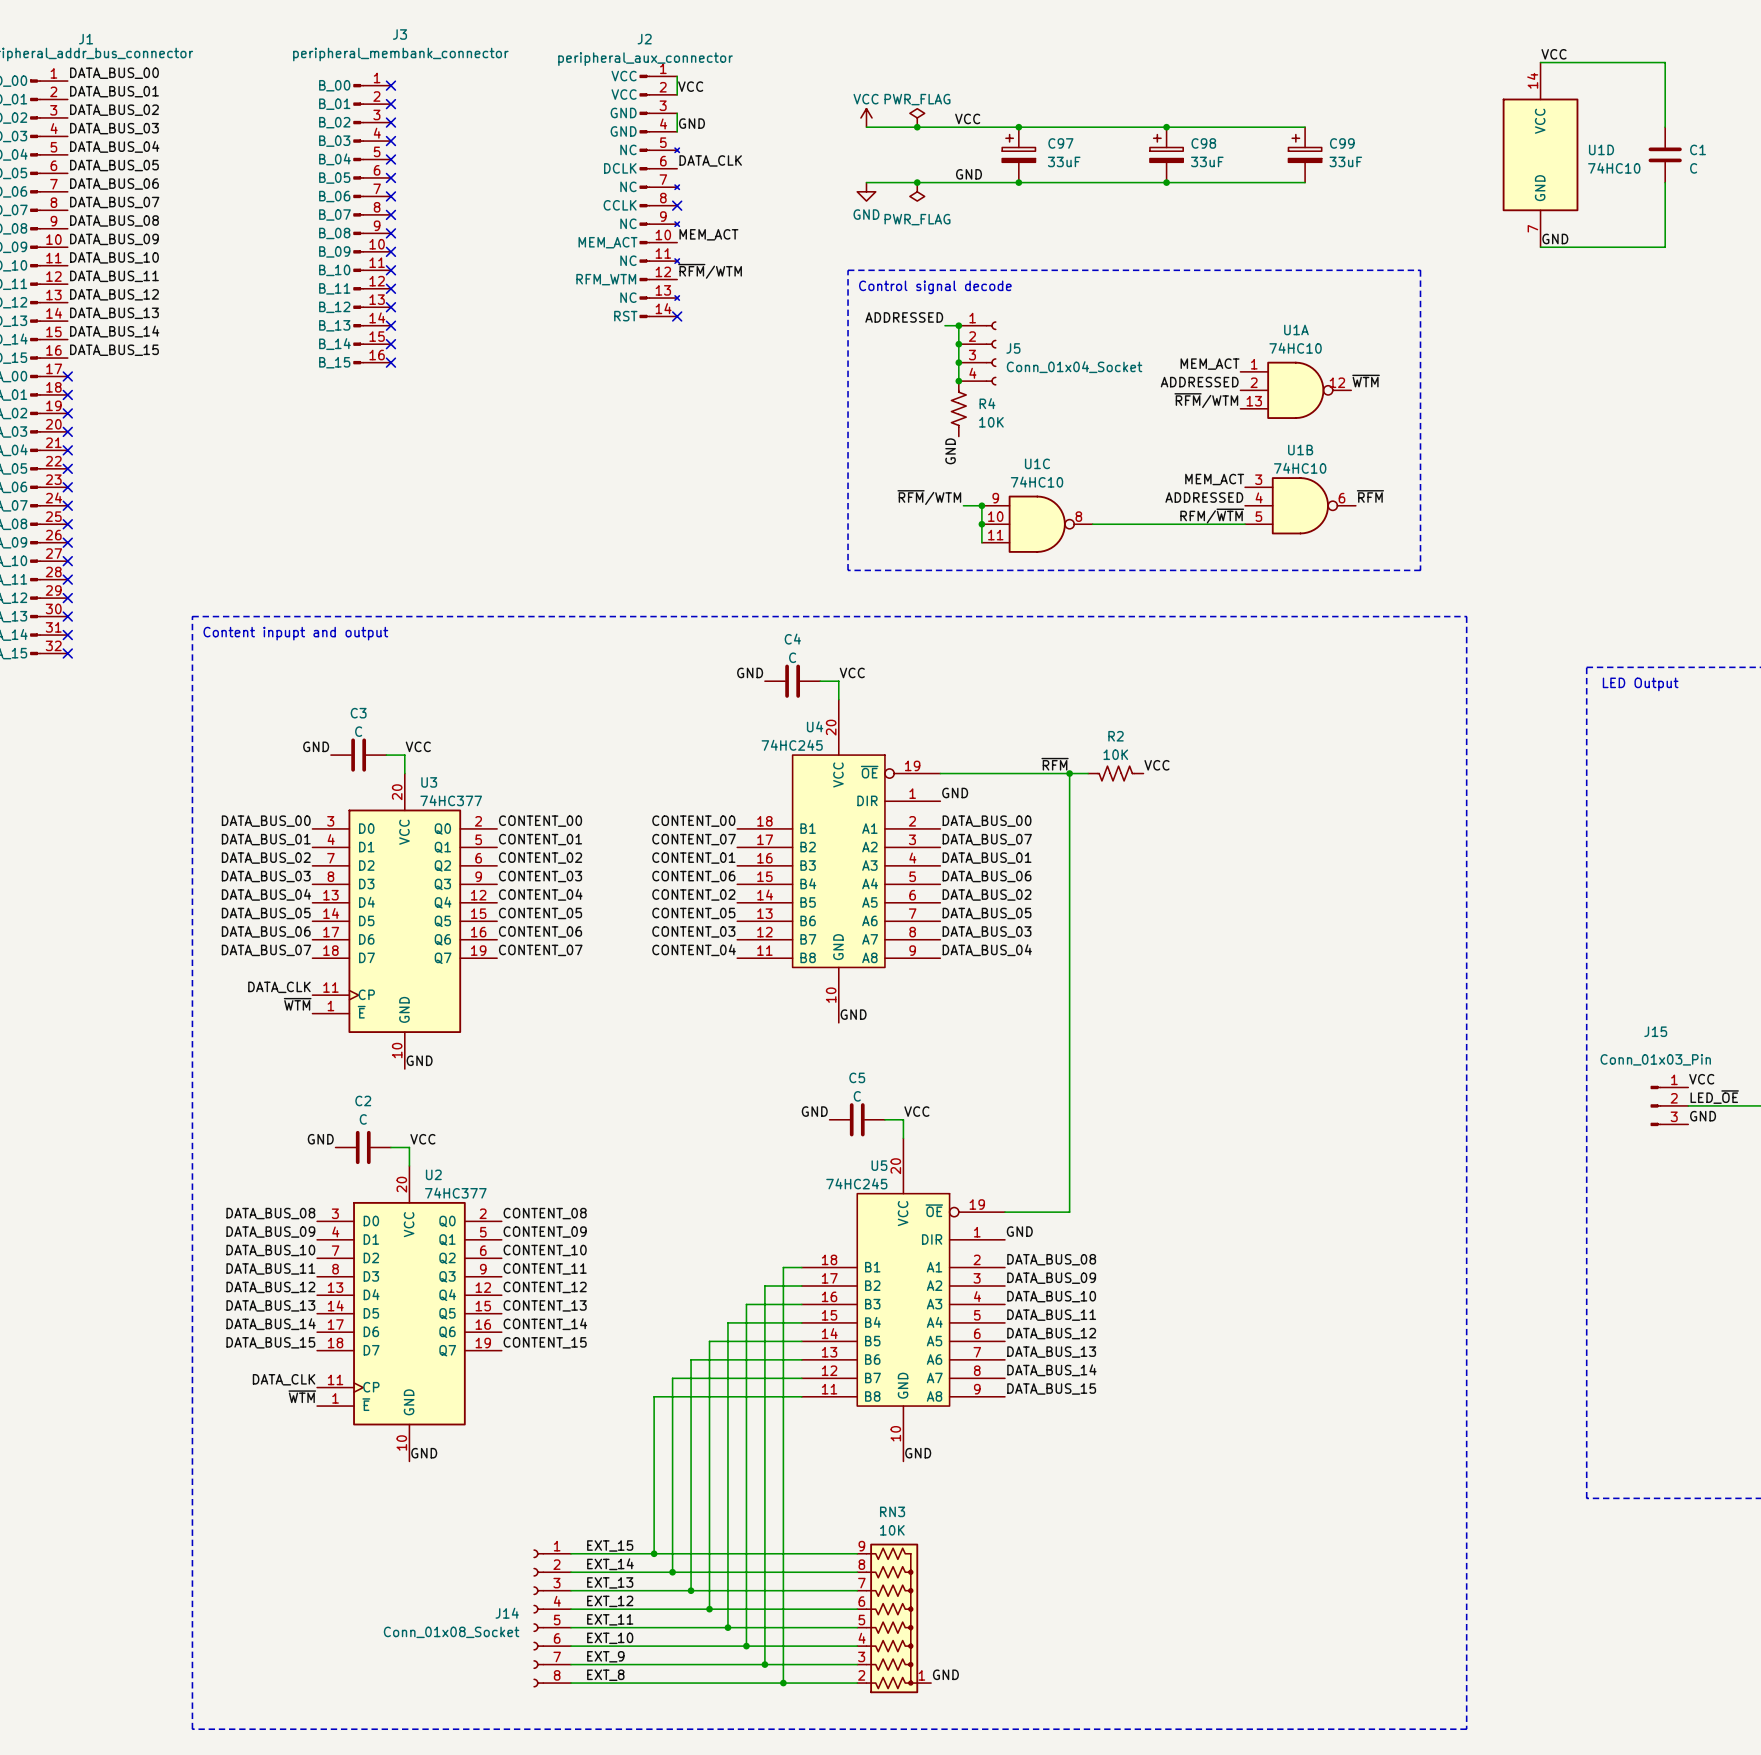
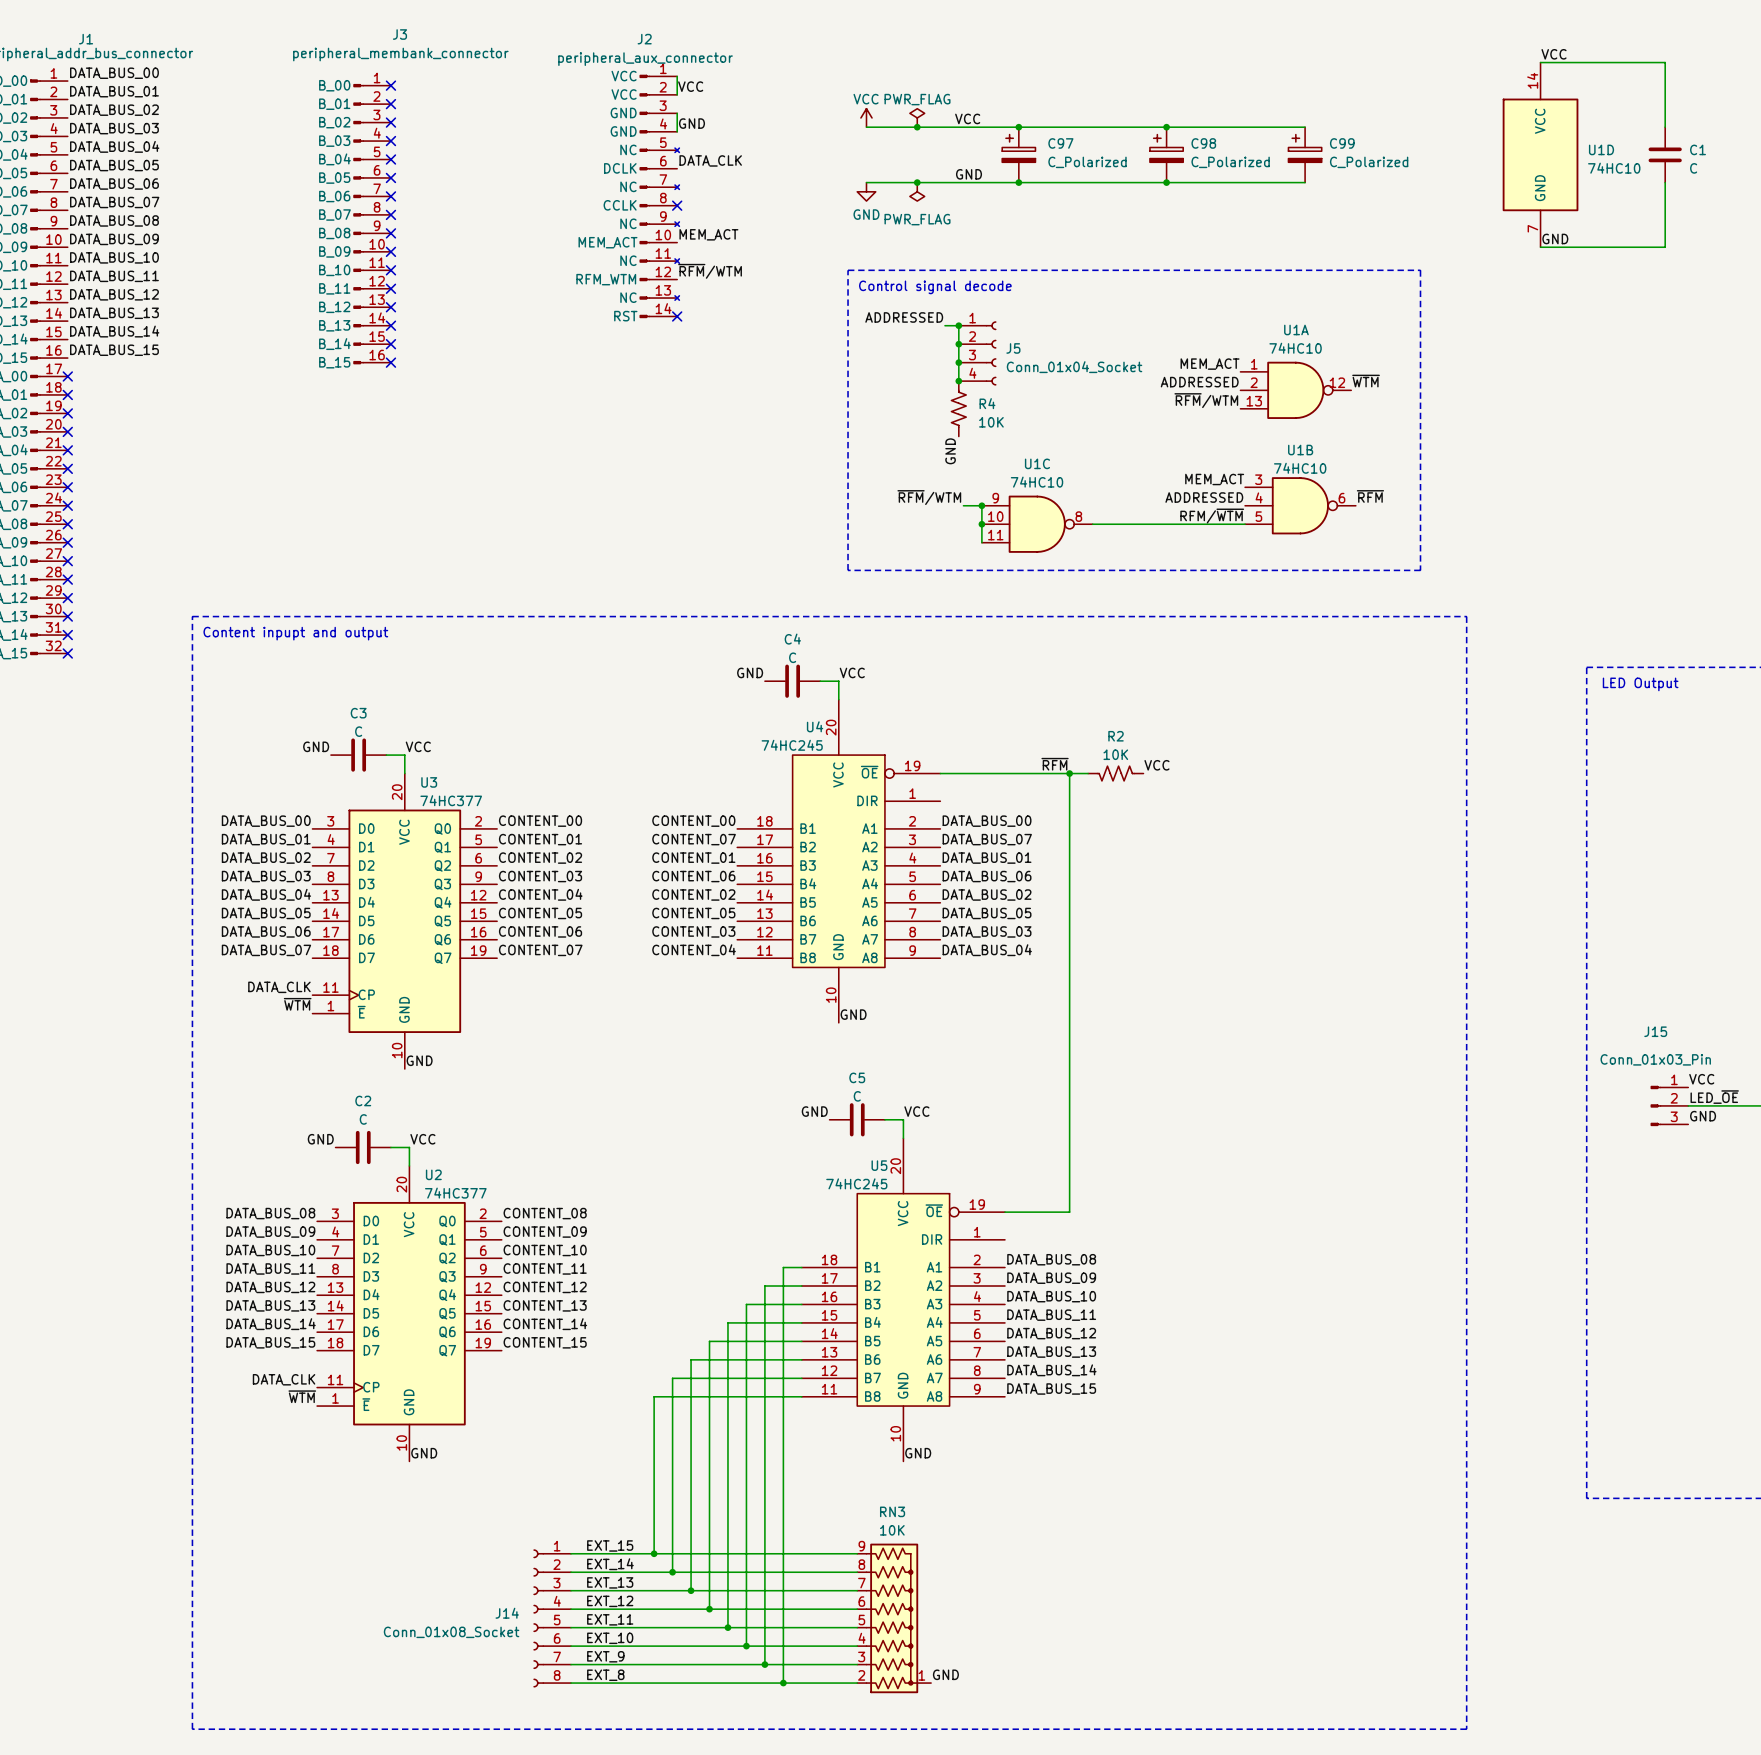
C97 value: 33uF (1064, 161) -> C_Polarized (1087, 162)
C98 value: 33uF (1207, 161) -> C_Polarized (1230, 162)
C99 value: 33uF (1345, 161) -> C_Polarized (1369, 162)
label: GND (955, 793) -> none
label: GND (1019, 1231) -> none

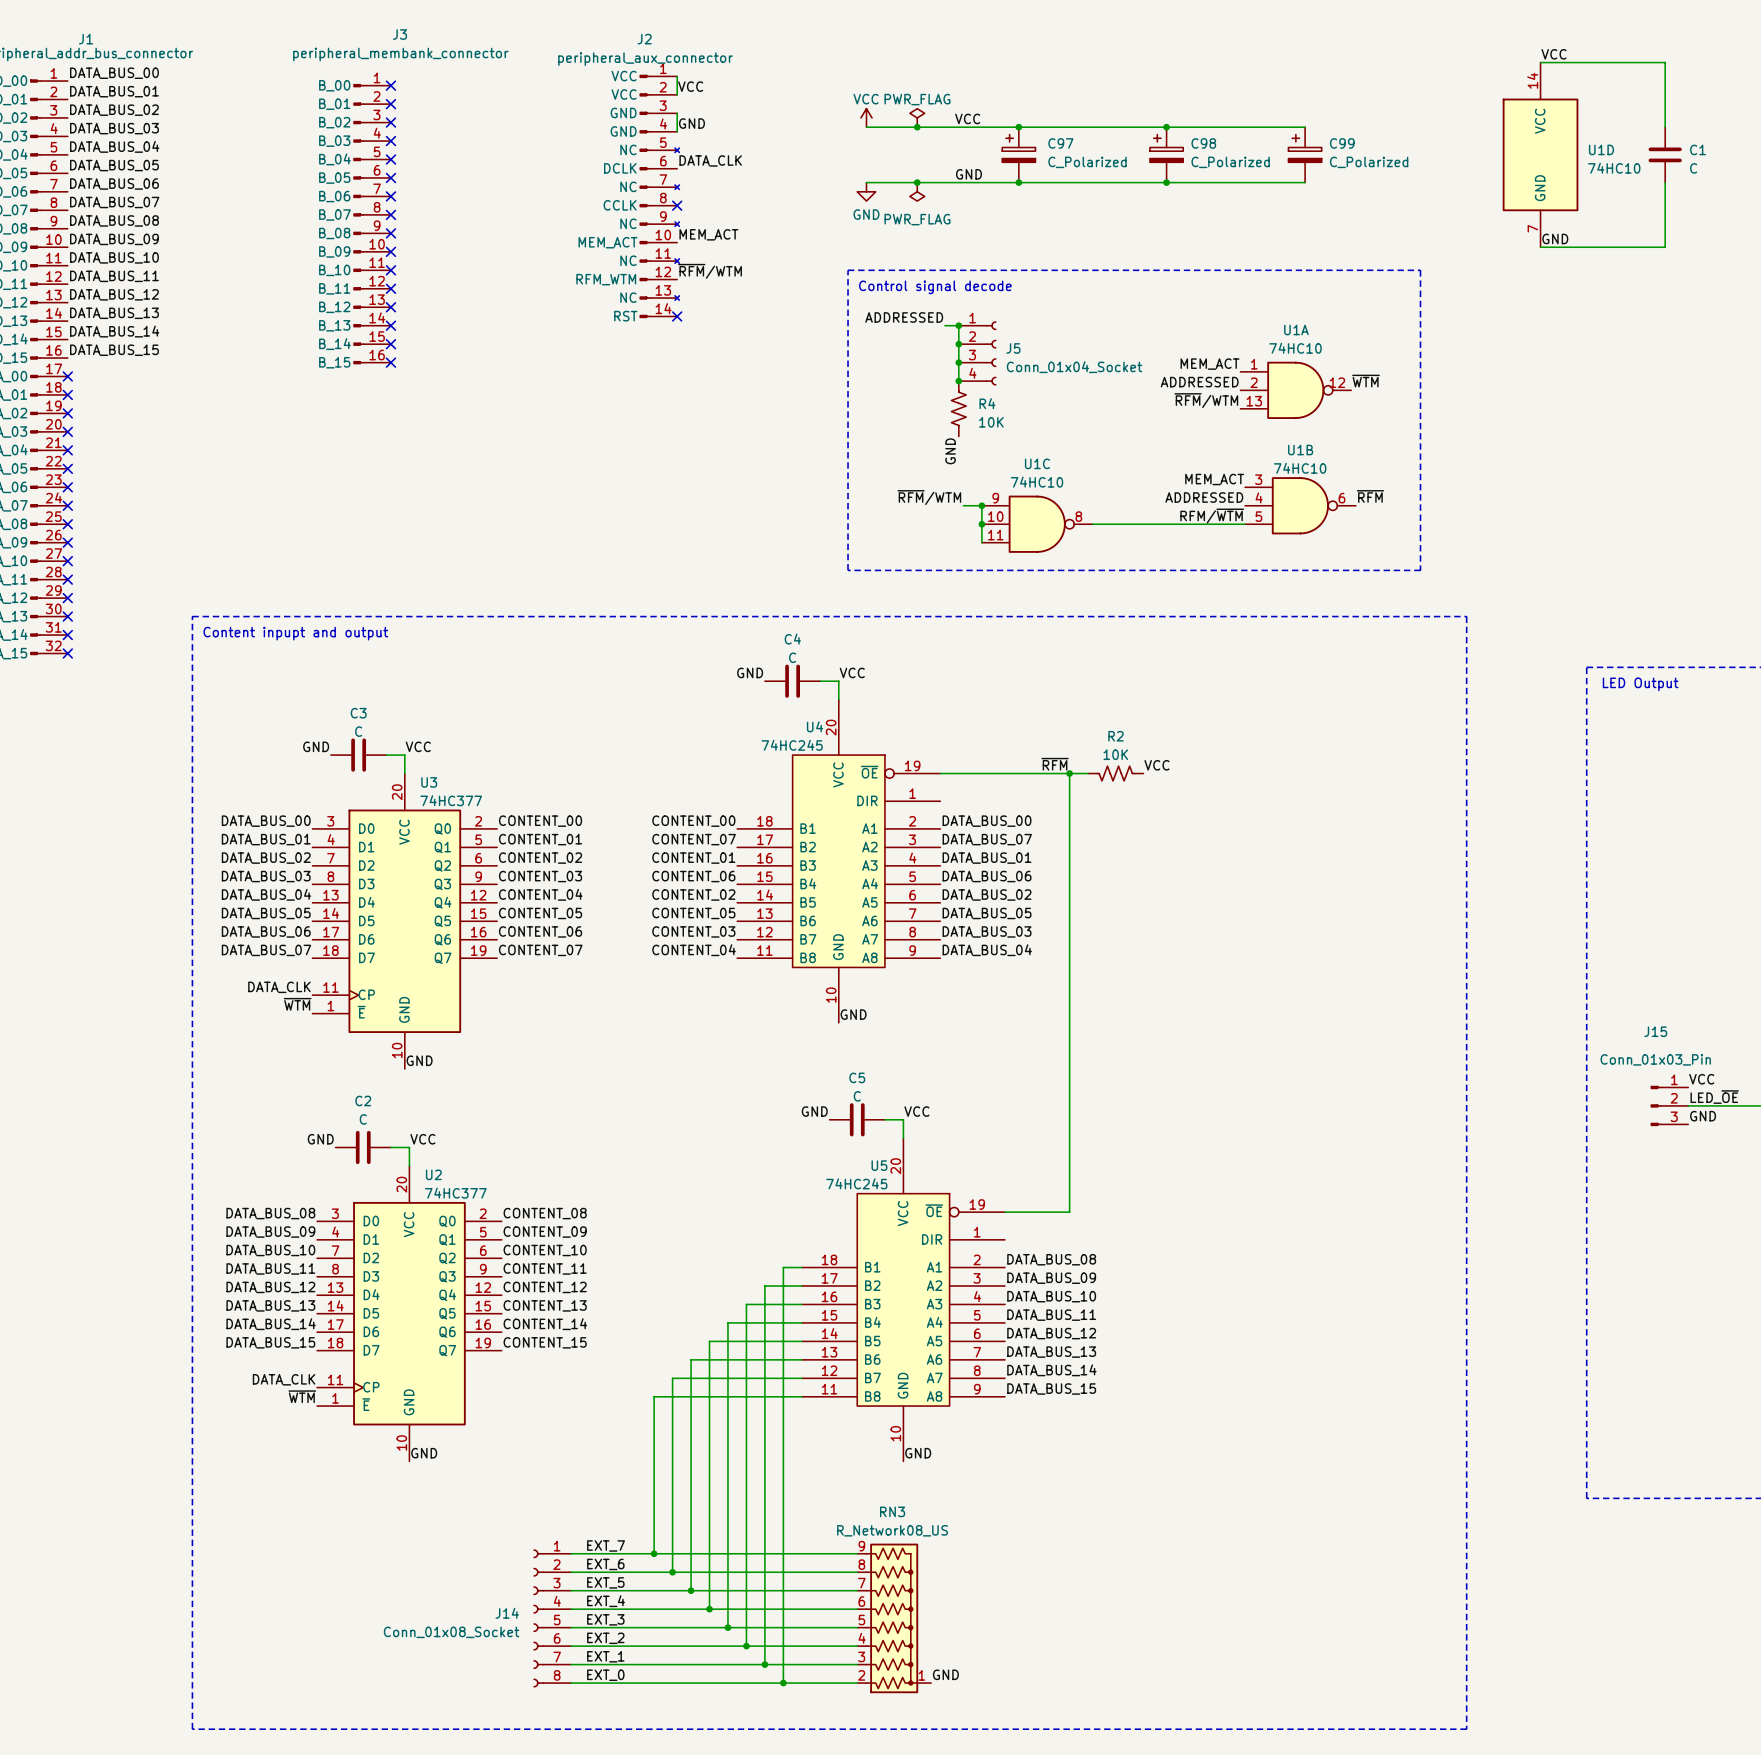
RN3 value: 10K (892, 1530) -> R_Network08_US (892, 1530)
label: EXT_15 (610, 1545) -> EXT_7 (606, 1545)
label: EXT_14 (610, 1564) -> EXT_6 (605, 1564)
label: EXT_13 (610, 1582) -> EXT_5 (605, 1582)
label: EXT_12 (610, 1601) -> EXT_4 (606, 1601)
label: EXT_11 (610, 1619) -> EXT_3 (605, 1619)
label: EXT_10 (610, 1638) -> EXT_2 (605, 1638)
label: EXT_9 (605, 1656) -> EXT_1 (605, 1656)
label: EXT_8 (605, 1675) -> EXT_0 (605, 1675)

